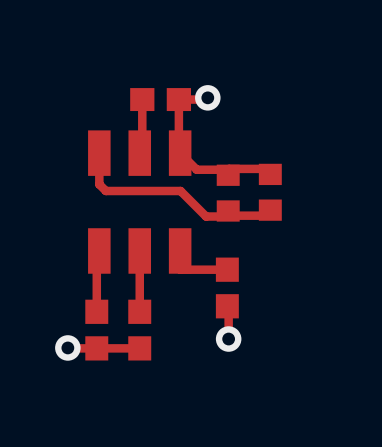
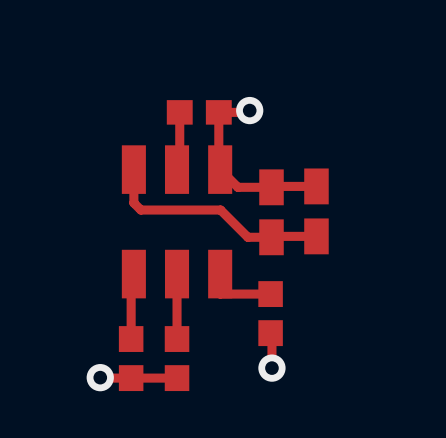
part footprint: [258, 163, 282, 221] -> [304, 168, 329, 255]
part footprint: [216, 164, 240, 222] -> [259, 169, 284, 256]

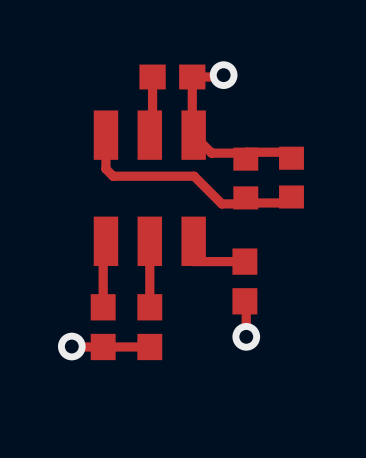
part footprint: [304, 168, 329, 255] -> [279, 146, 304, 209]
part footprint: [259, 169, 284, 256] -> [233, 147, 259, 210]

